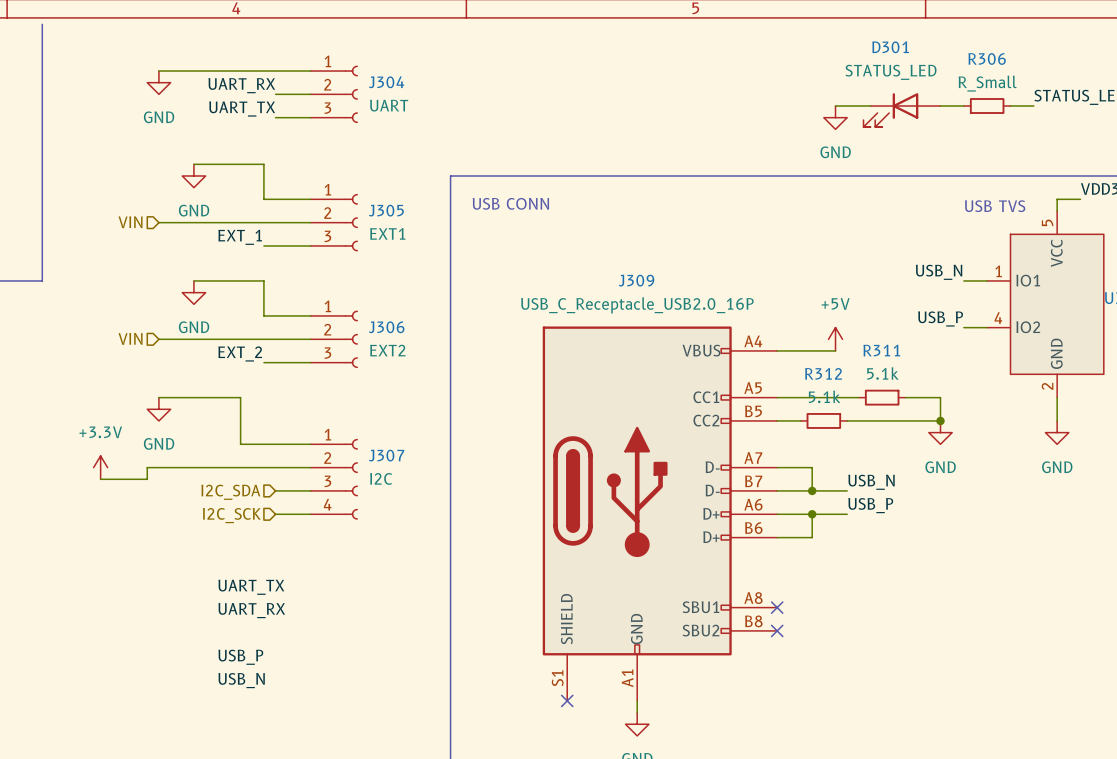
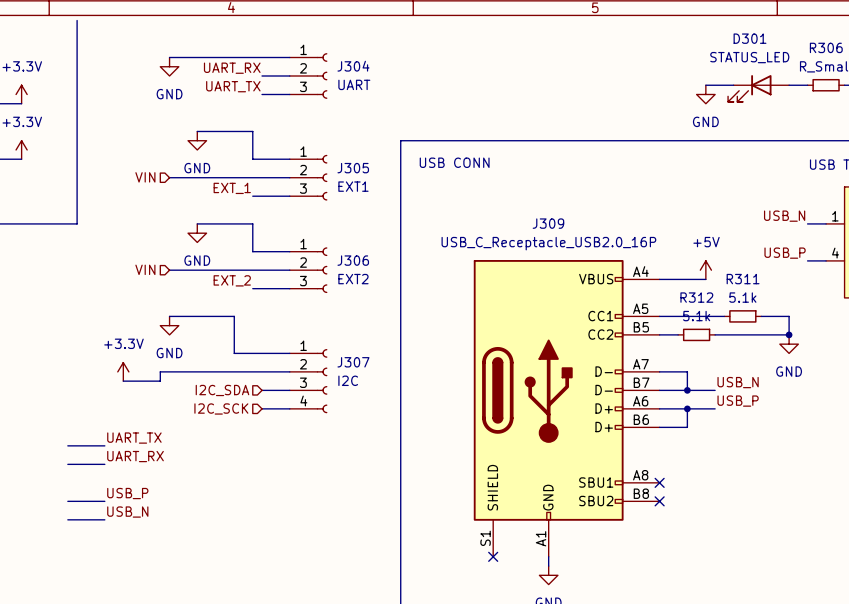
wire: none -> (67, 445) (104, 445)
wire: none -> (67, 464) (104, 464)
label position: UART_TX (251, 587) -> UART_TX (134, 438)
label position: UART_RX (251, 610) -> UART_RX (135, 456)
wire: none -> (67, 501) (104, 501)
wire: none -> (67, 519) (104, 519)
label position: USB_P (240, 657) -> USB_P (127, 493)
label position: USB_N (241, 680) -> USB_N (127, 512)

